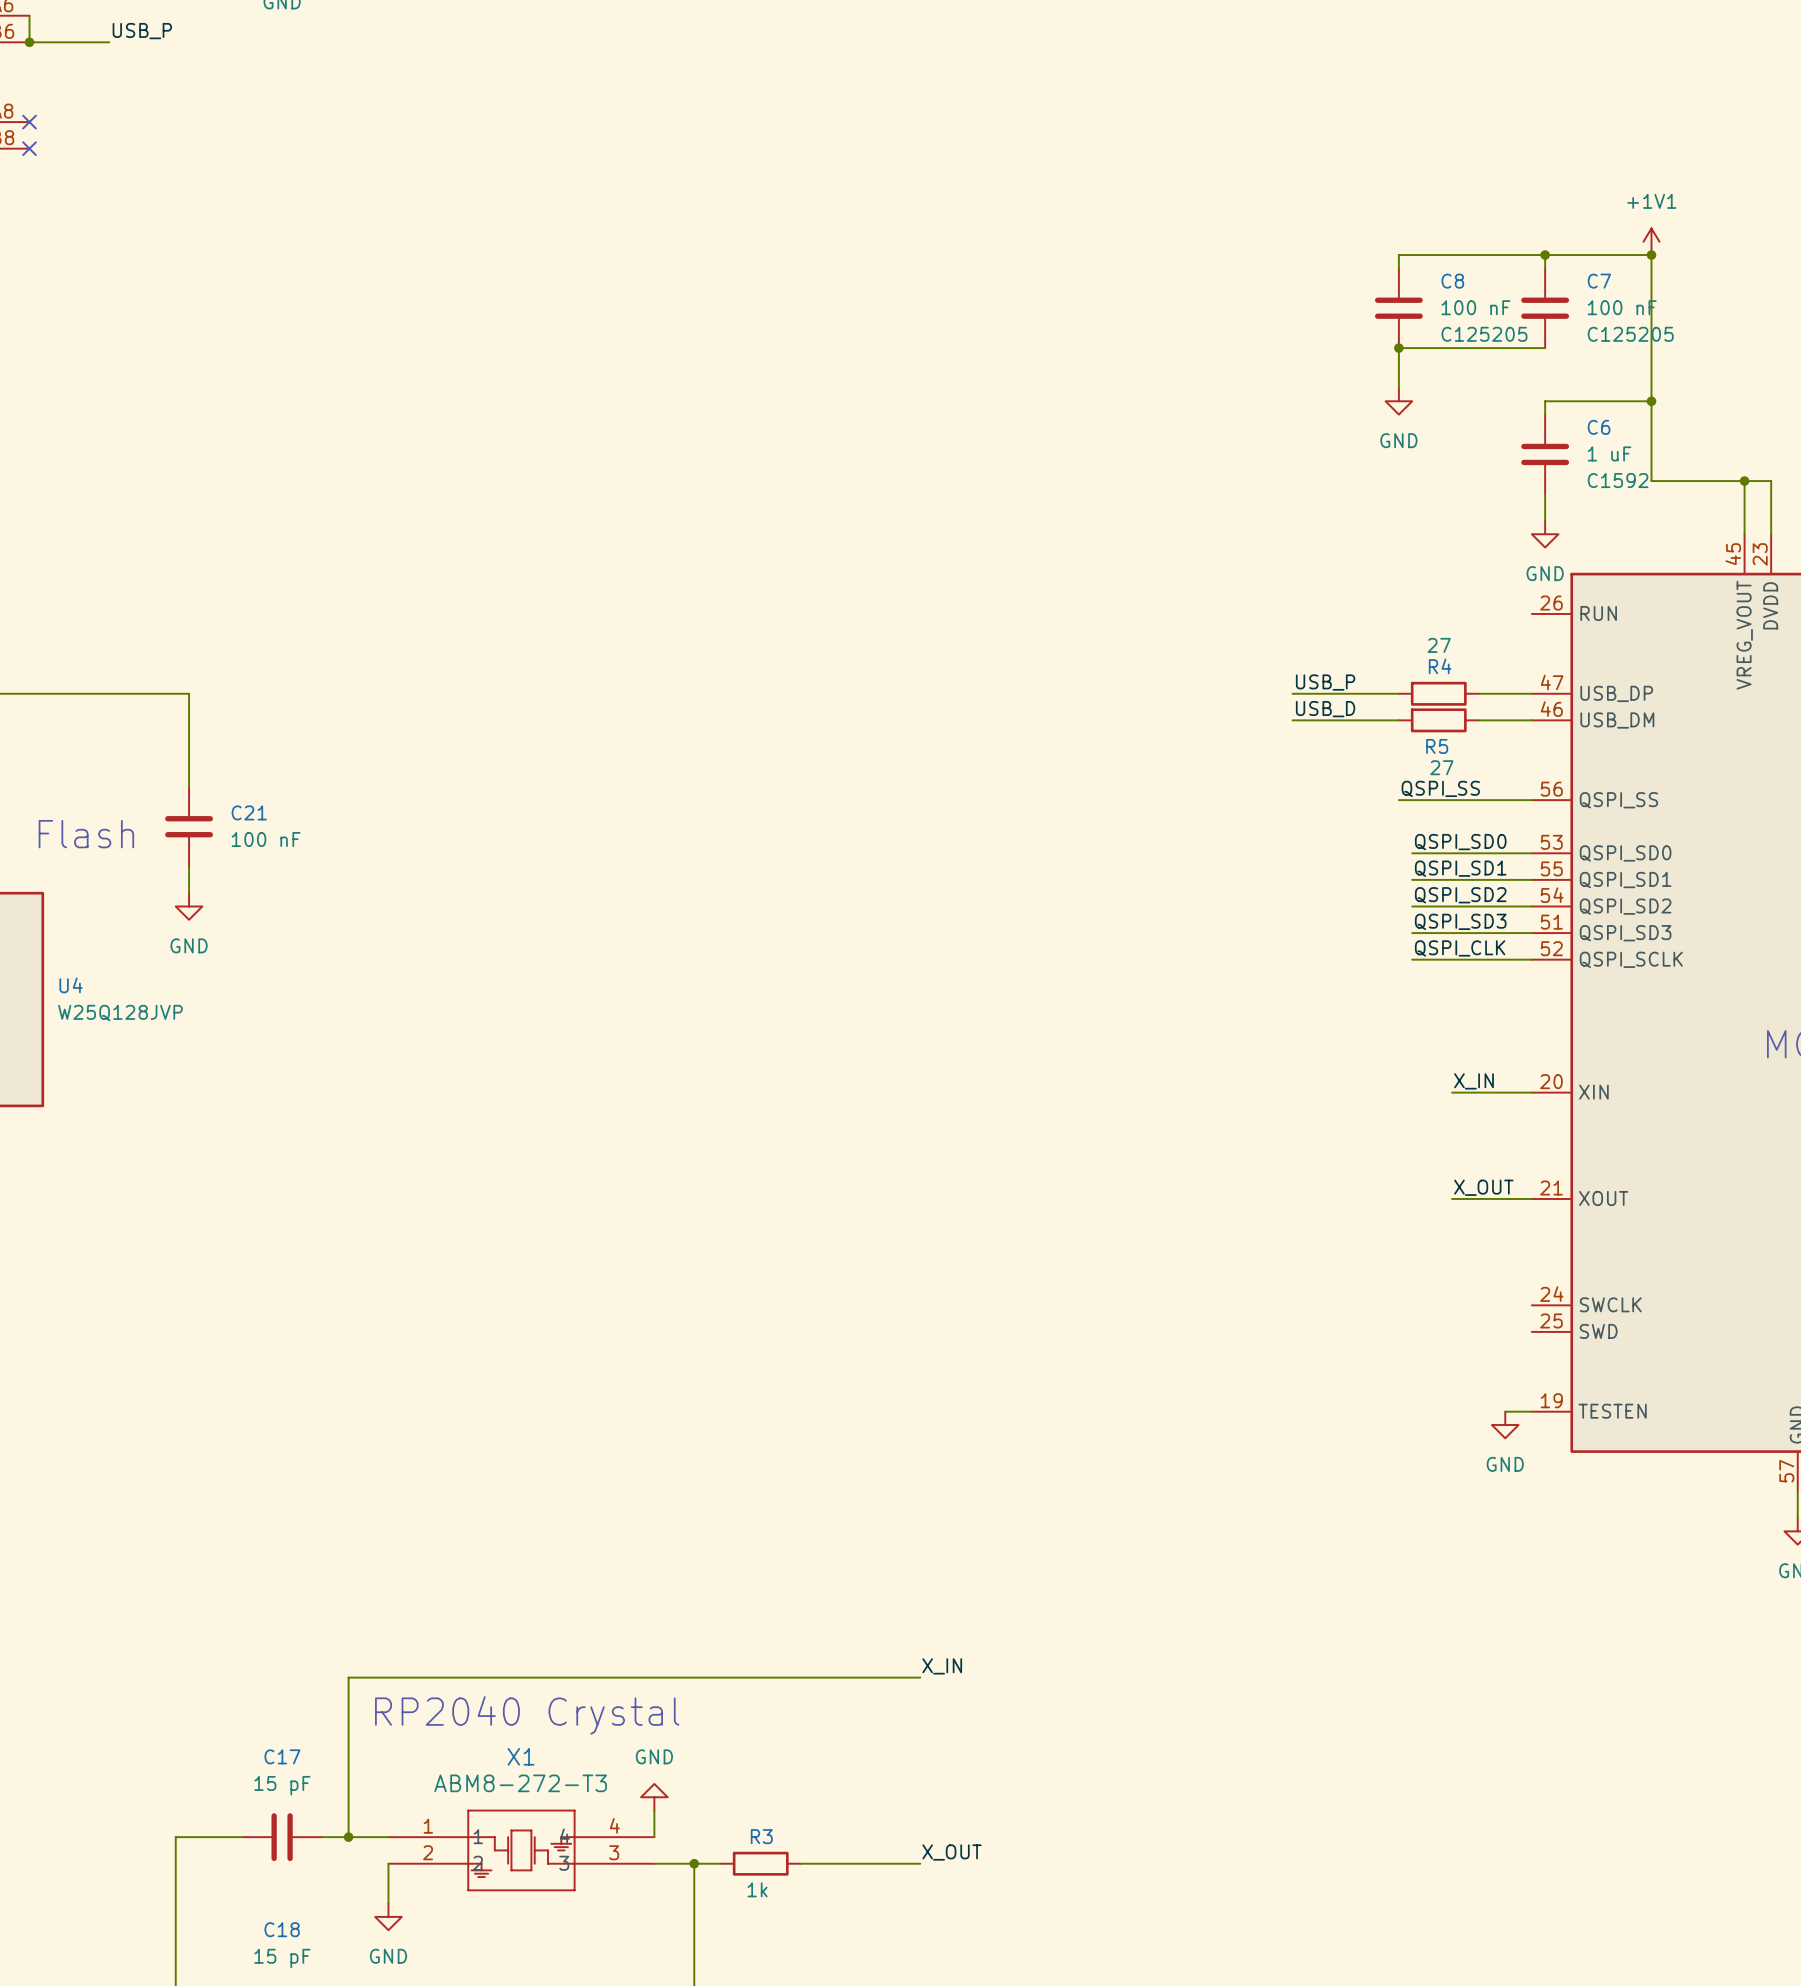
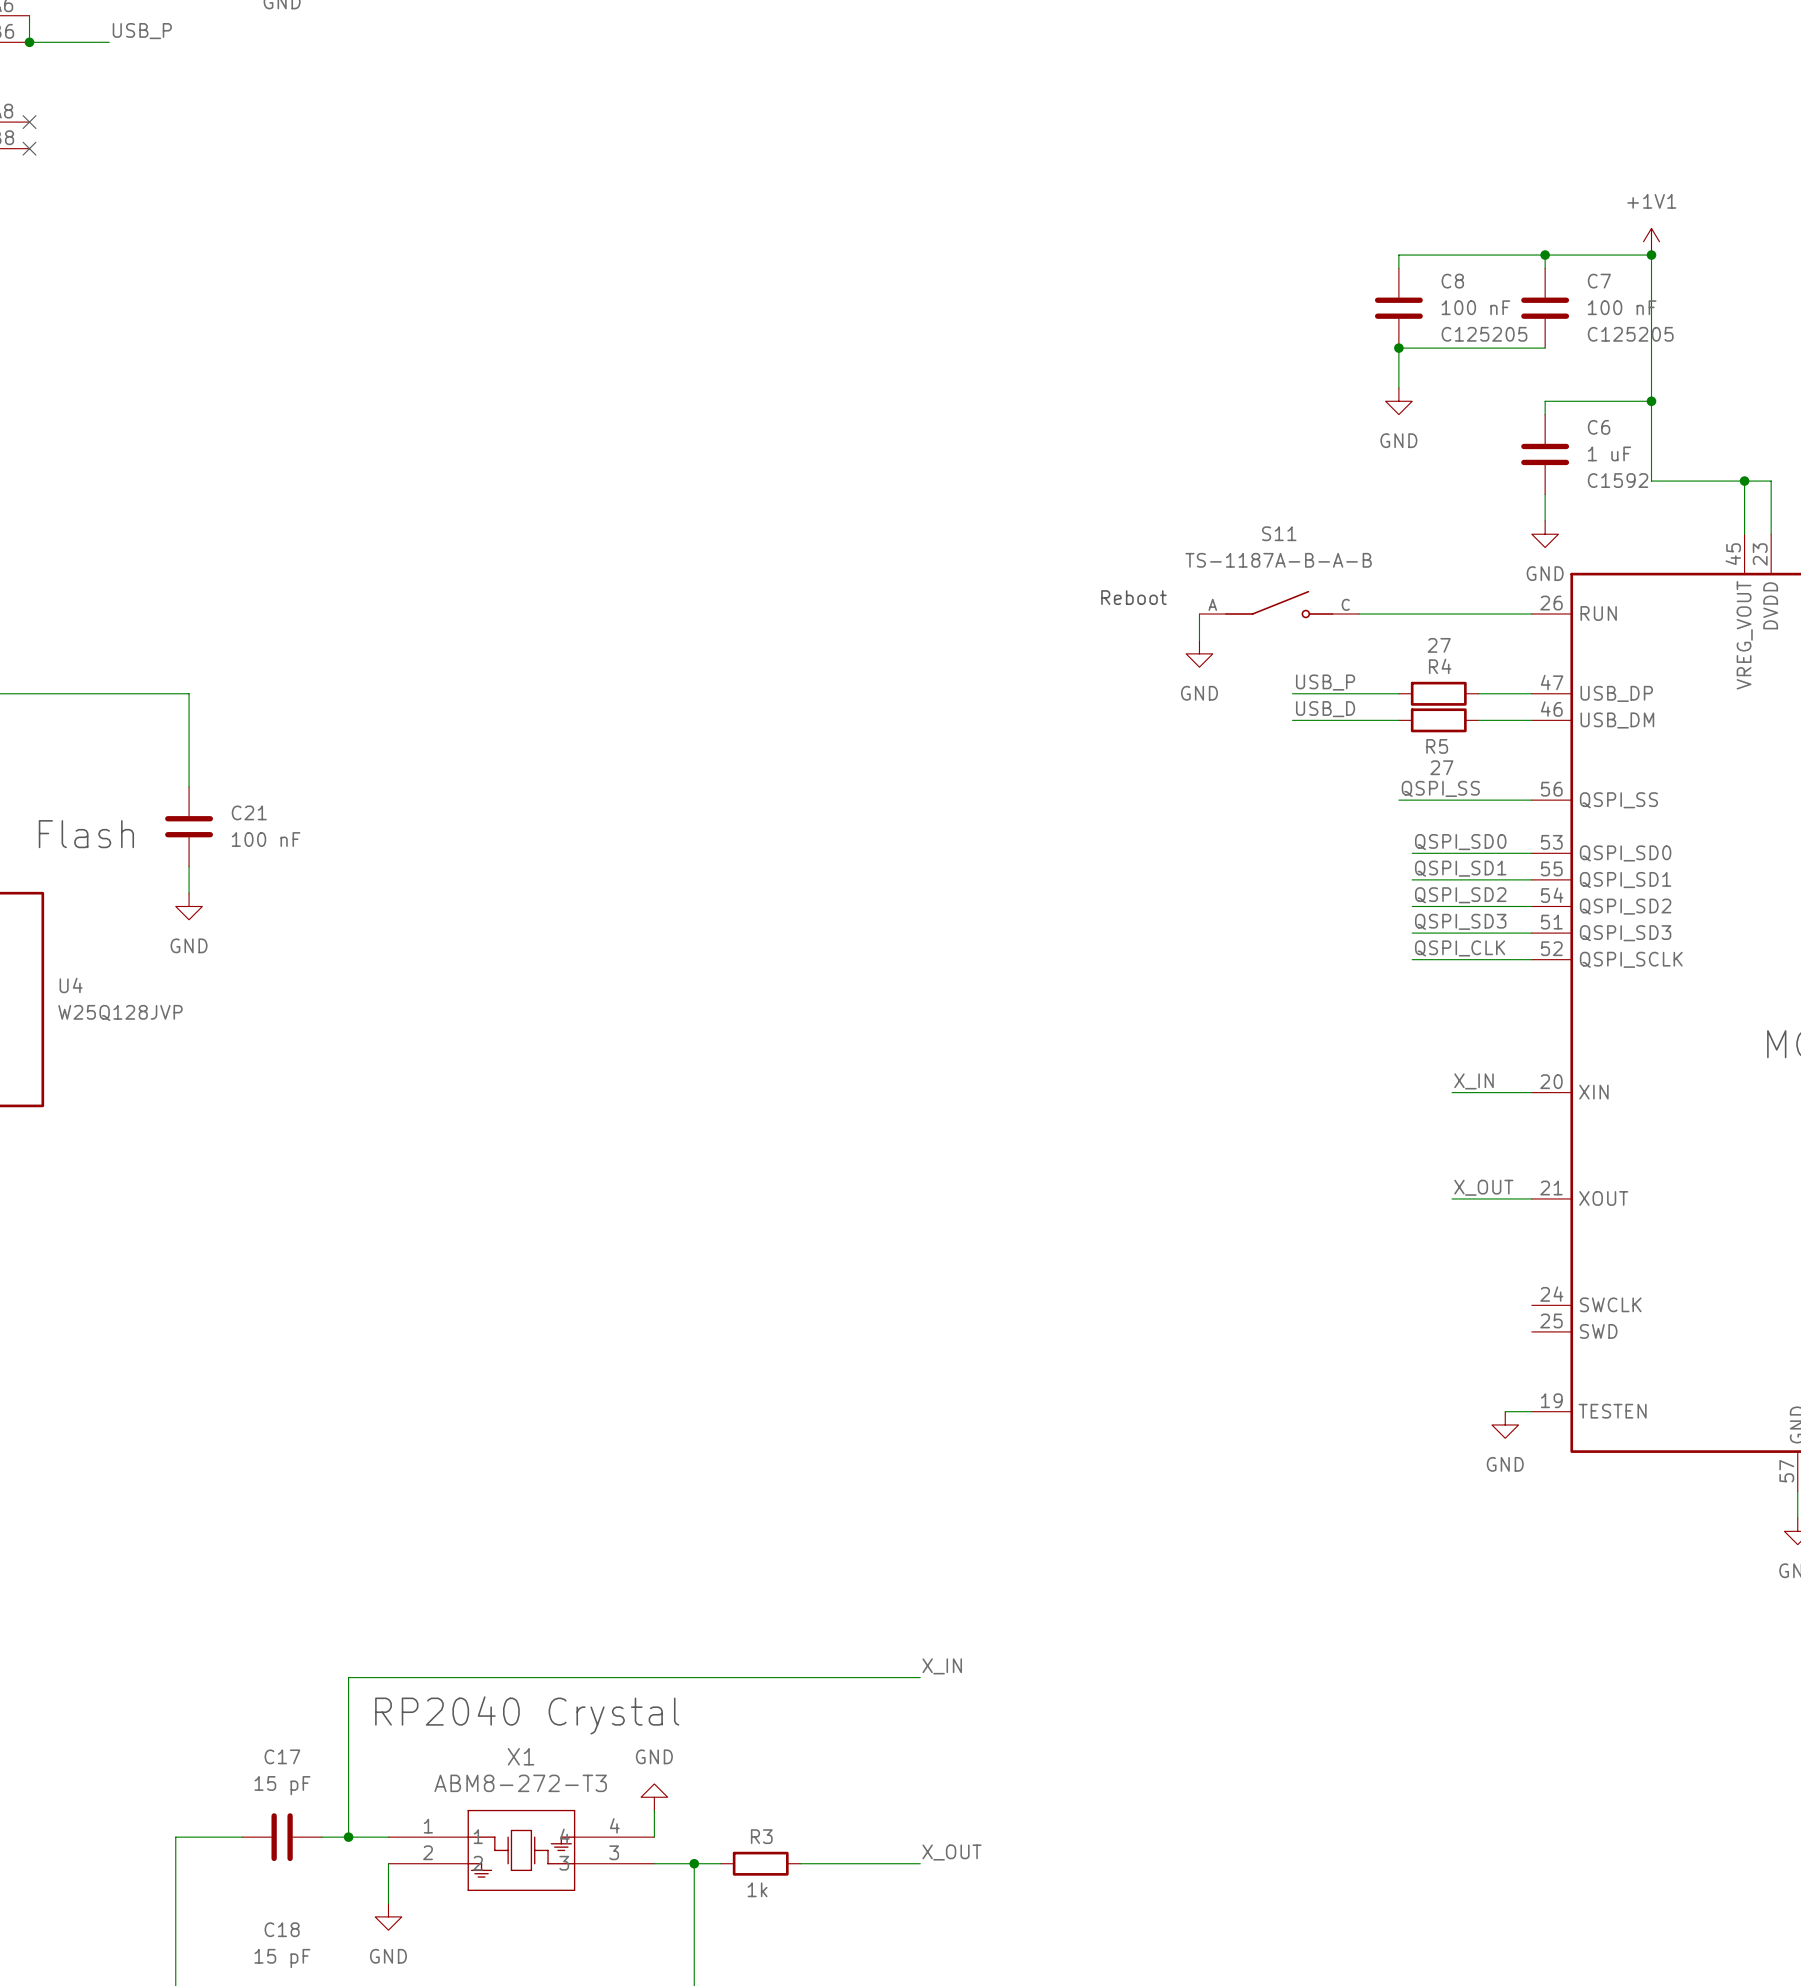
text: none -> Reboot (1133, 597)
S11: none -> TS-1187A-B-A-B (1279, 604)
wire: none -> (1199, 614) (1199, 640)
wire: none -> (1359, 614) (1531, 614)
power symbol: none -> GND (1199, 653)

